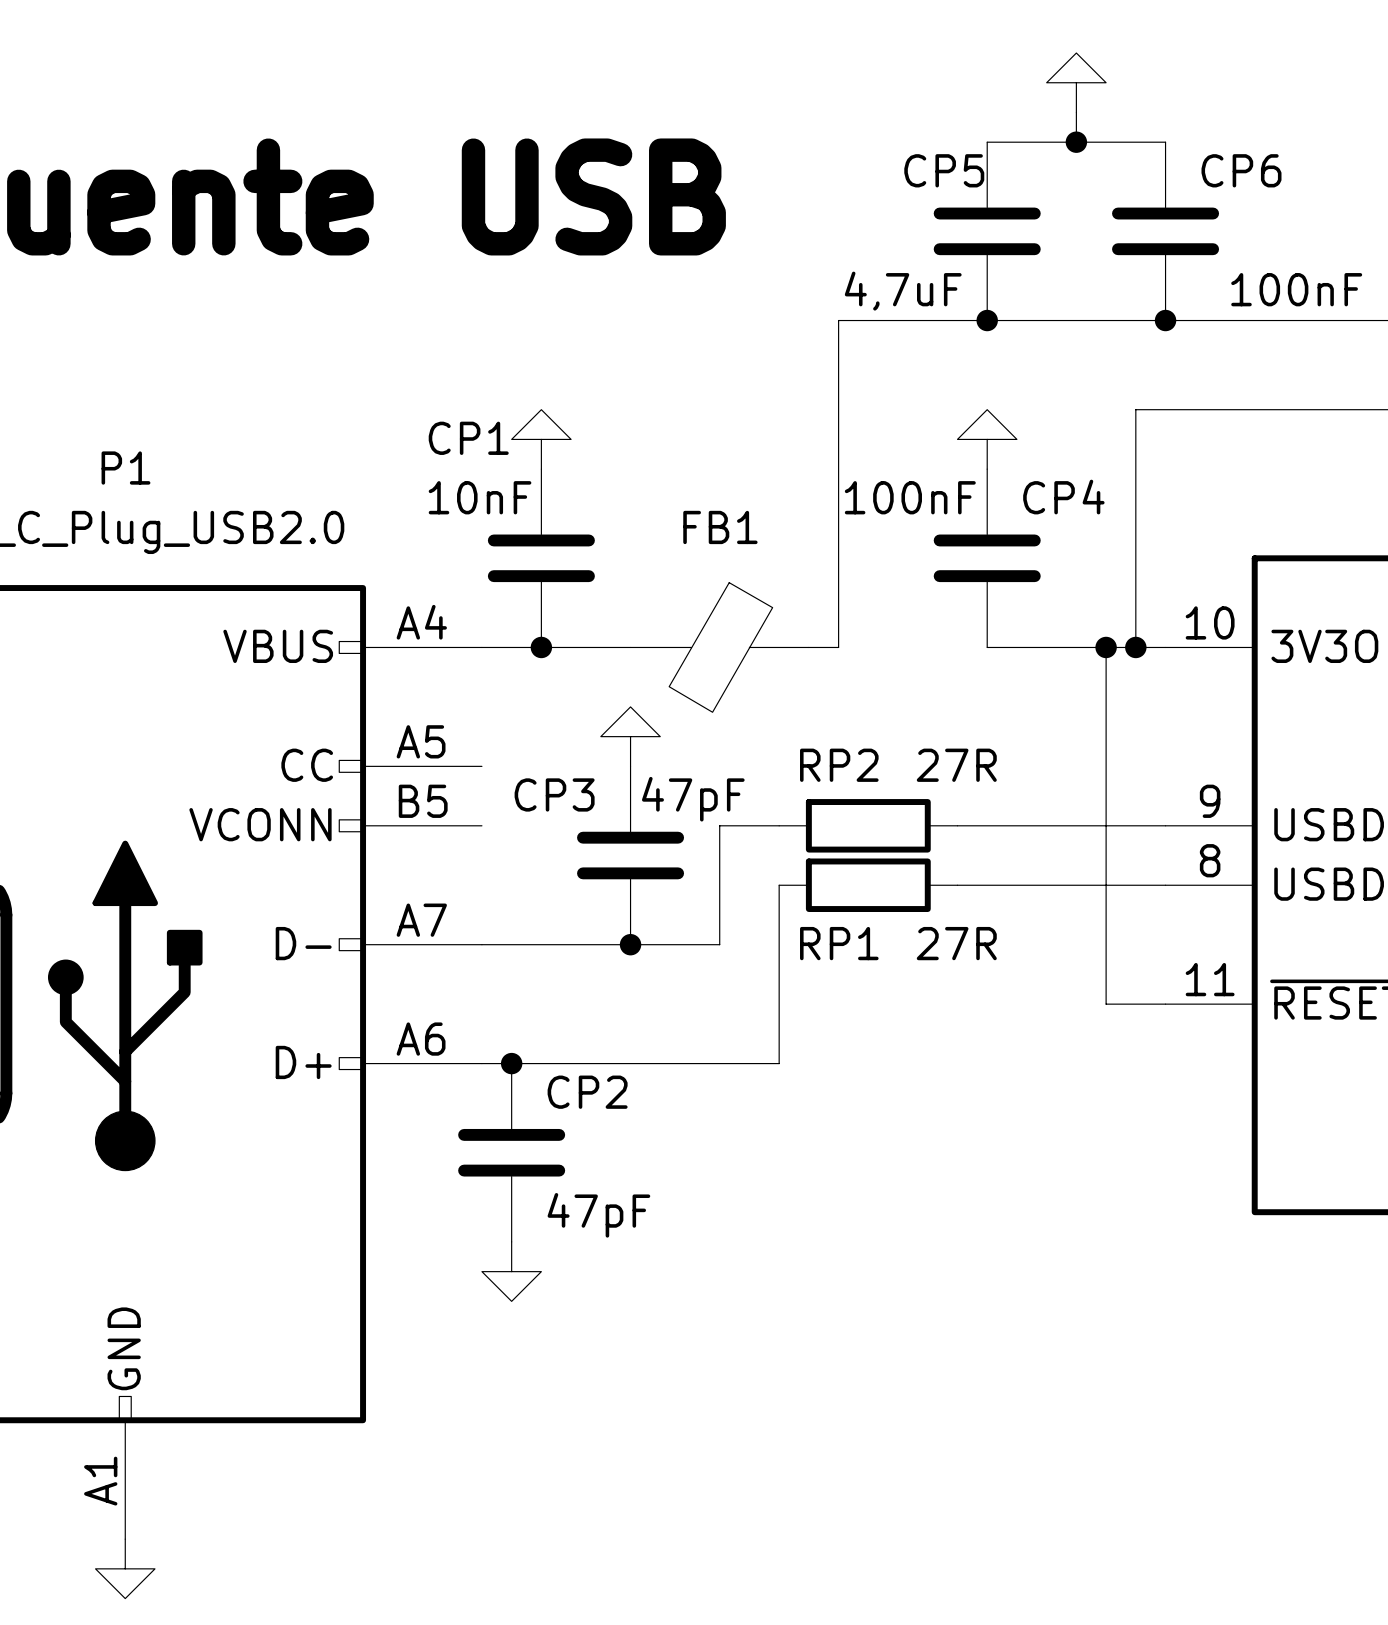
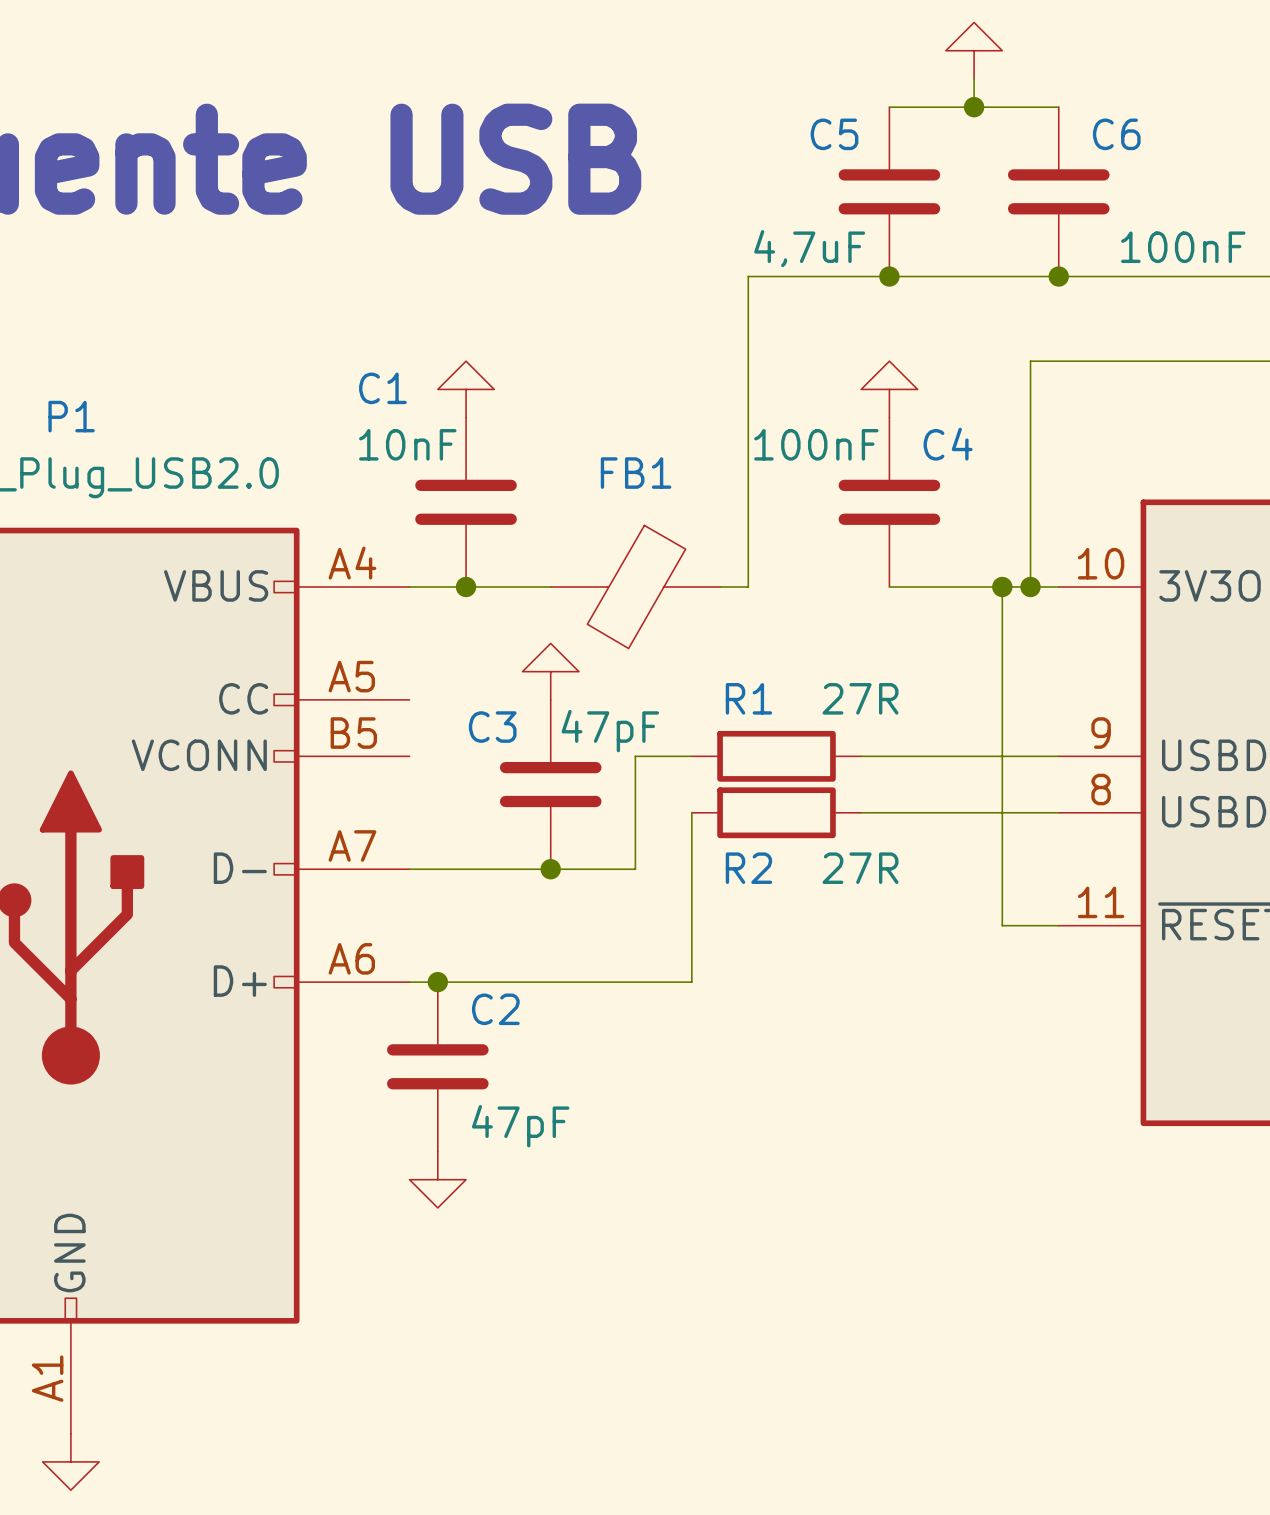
CP5 name: CP5 (944, 170) -> C5 (834, 134)
CP6 name: CP6 (1241, 170) -> C6 (1116, 134)
CP1 name: CP1 (468, 438) -> C1 (382, 388)
CP4 name: CP4 (1063, 497) -> C4 (948, 444)
RP2 name: RP2 (839, 765) -> R1 (748, 698)
CP3 name: CP3 (554, 794) -> C3 (492, 727)
RP1 name: RP1 (839, 943) -> R2 (748, 868)
CP2 name: CP2 (587, 1092) -> C2 (495, 1009)

